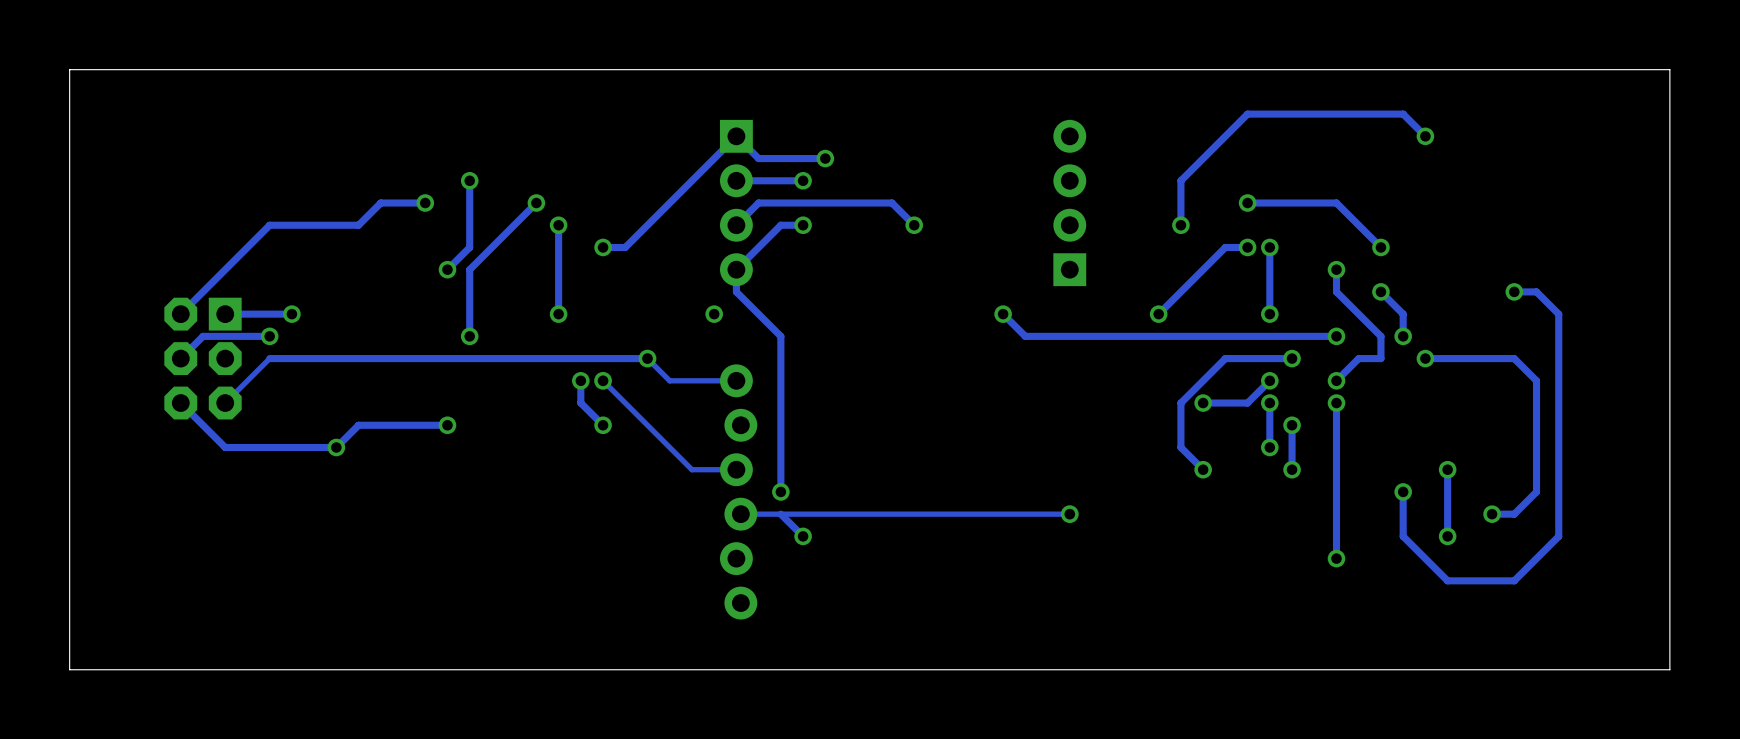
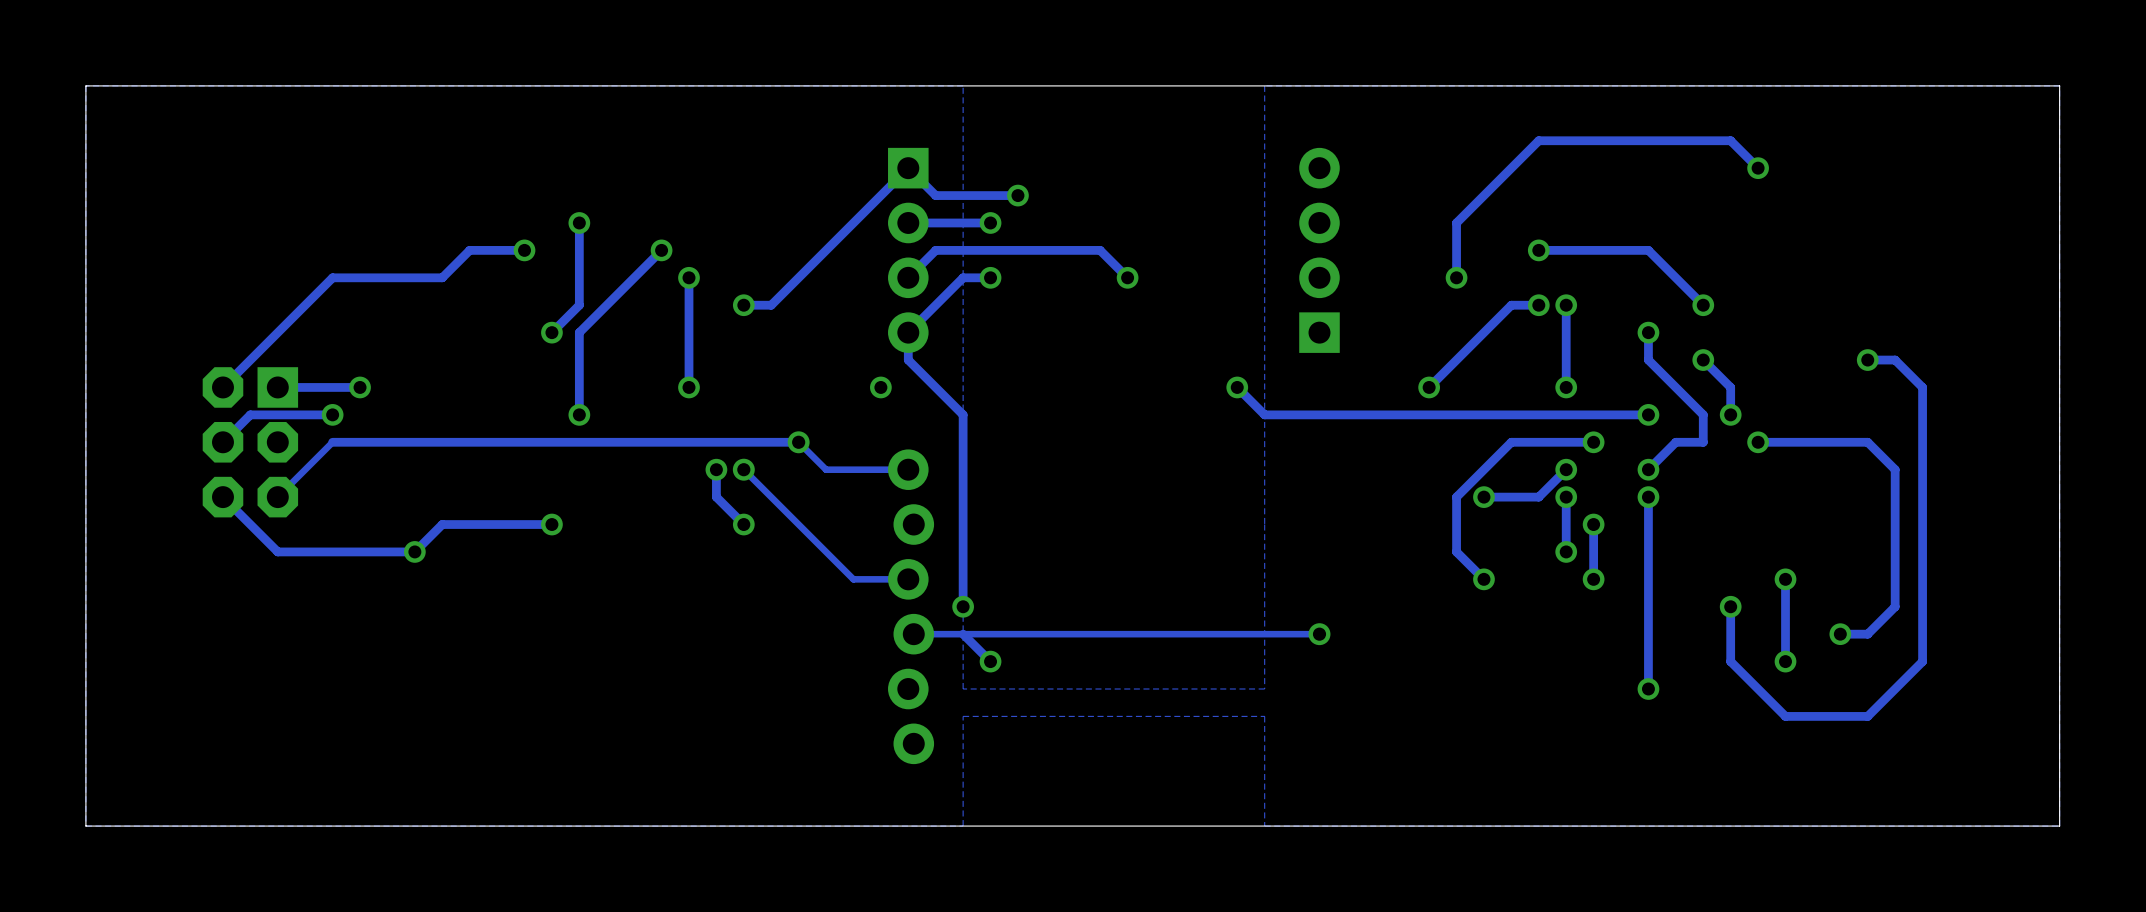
zone outline: none -> (2059, 85) (2059, 826) (1264, 826) (1264, 716) (963, 716) (963, 826) (85, 826) (85, 85) (963, 85) (963, 689) (1264, 689) (1264, 85) (2059, 85)

